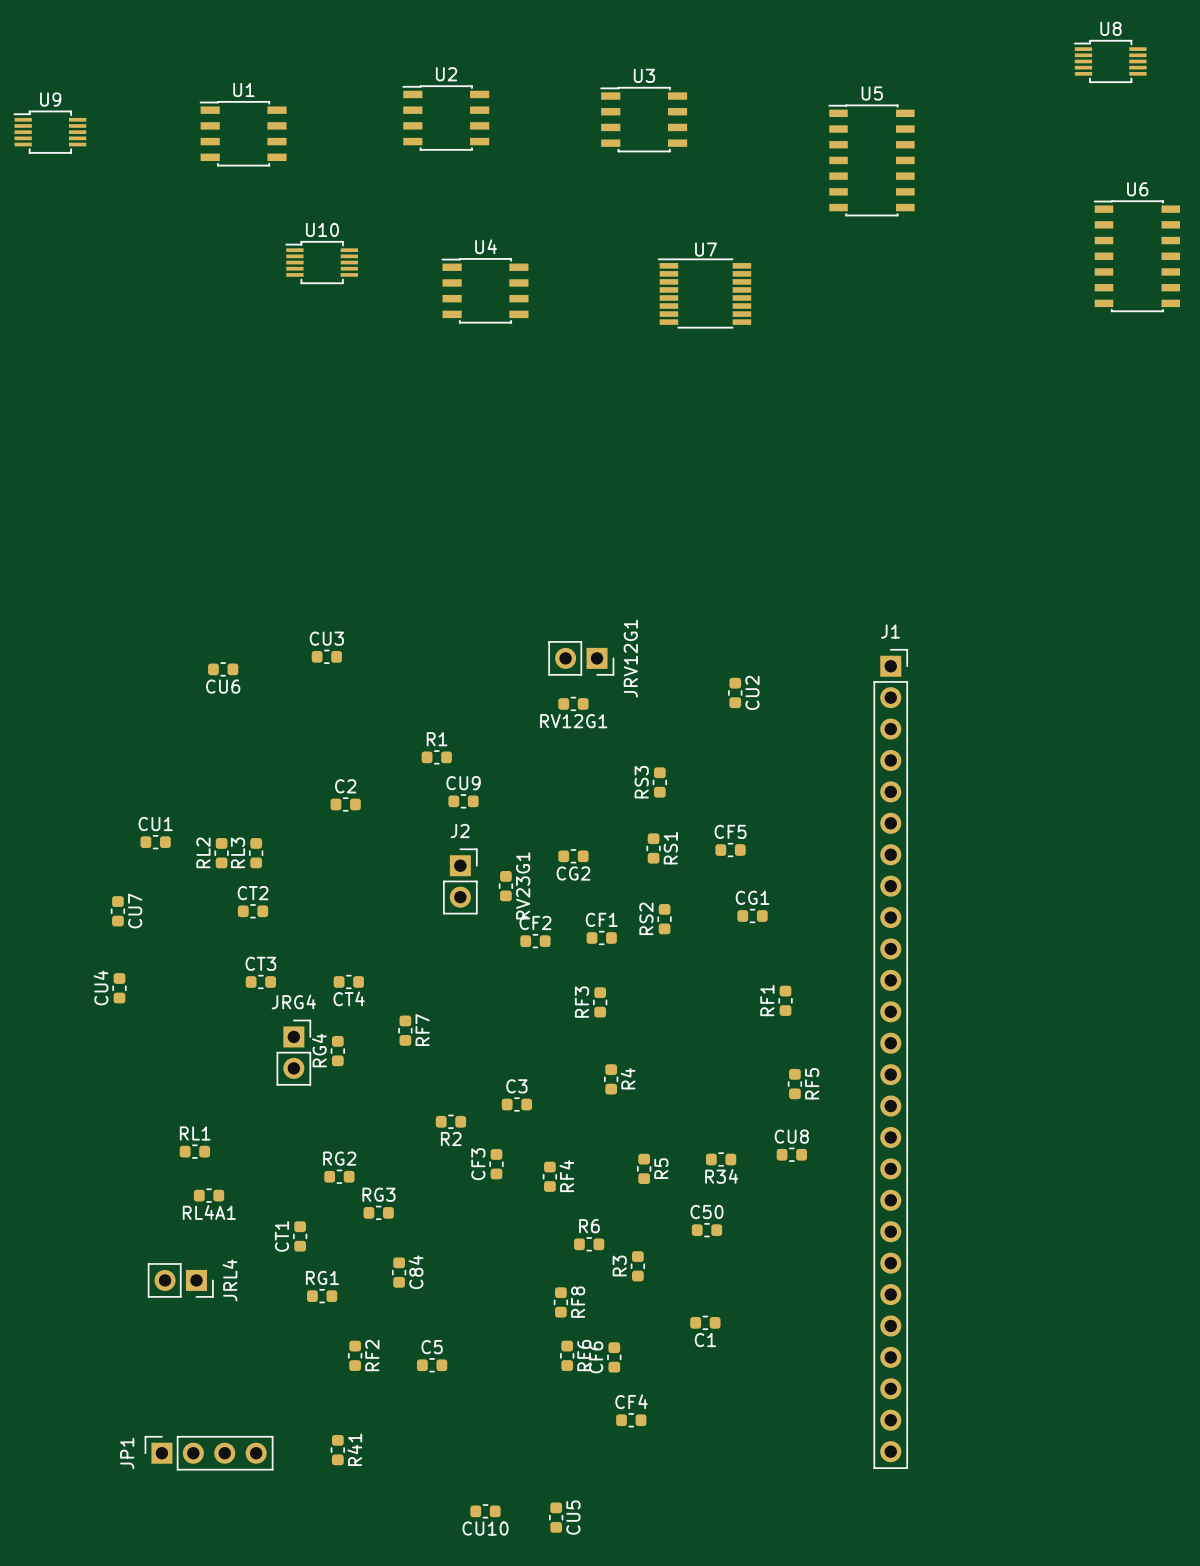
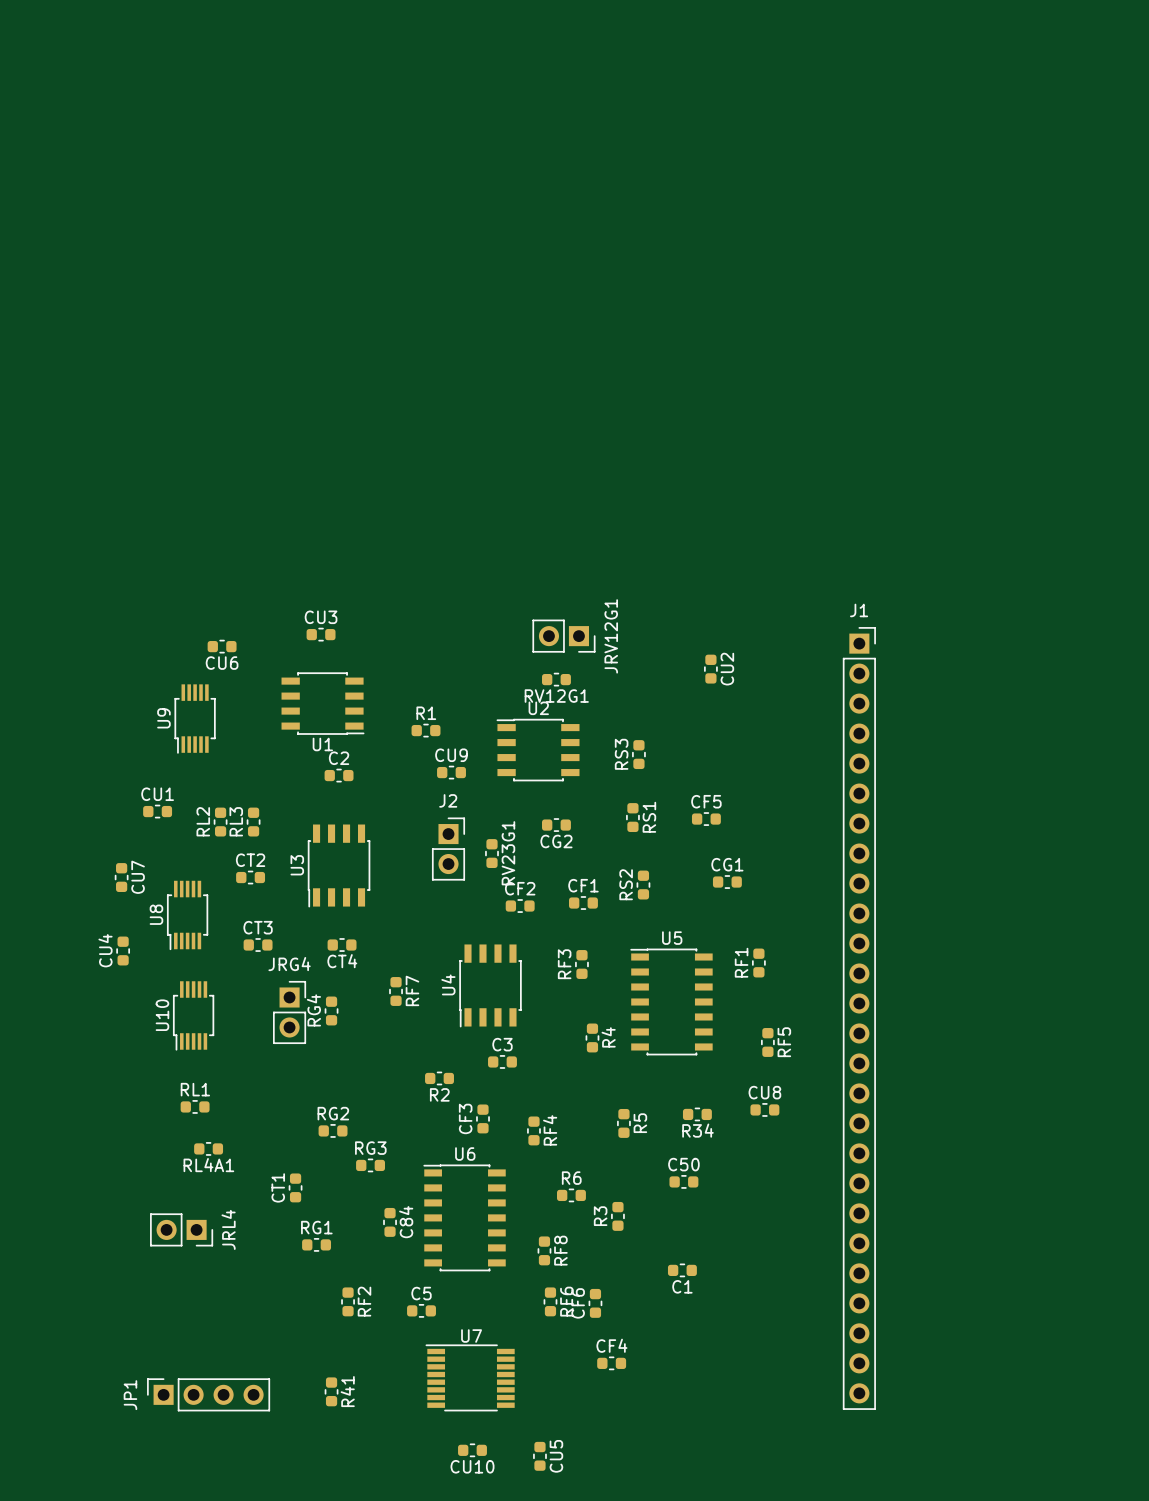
U8 rotation: 0° (1110, 61) -> 90° counterclockwise (187, 915)
U8 position: (1110, 61) -> (187, 915)
U2 position: (445, 118) -> (538, 750)
U3 rotation: 0° (643, 119) -> 90° counterclockwise (339, 865)
U3 position: (643, 119) -> (339, 865)
U9 rotation: 0° (49, 132) -> 90° counterclockwise (195, 719)
U9 position: (49, 132) -> (195, 719)
U1 rotation: 0° (243, 133) -> 180° (322, 703)
U1 position: (243, 133) -> (322, 703)
U5 position: (871, 160) -> (671, 1001)
U6 position: (1136, 256) -> (464, 1217)
U10 rotation: 0° (321, 262) -> 90° counterclockwise (193, 1015)
U10 position: (321, 262) -> (193, 1015)
U4 rotation: 0° (485, 290) -> 90° counterclockwise (490, 985)
U4 position: (485, 290) -> (490, 985)
U7 position: (704, 293) -> (470, 1377)

